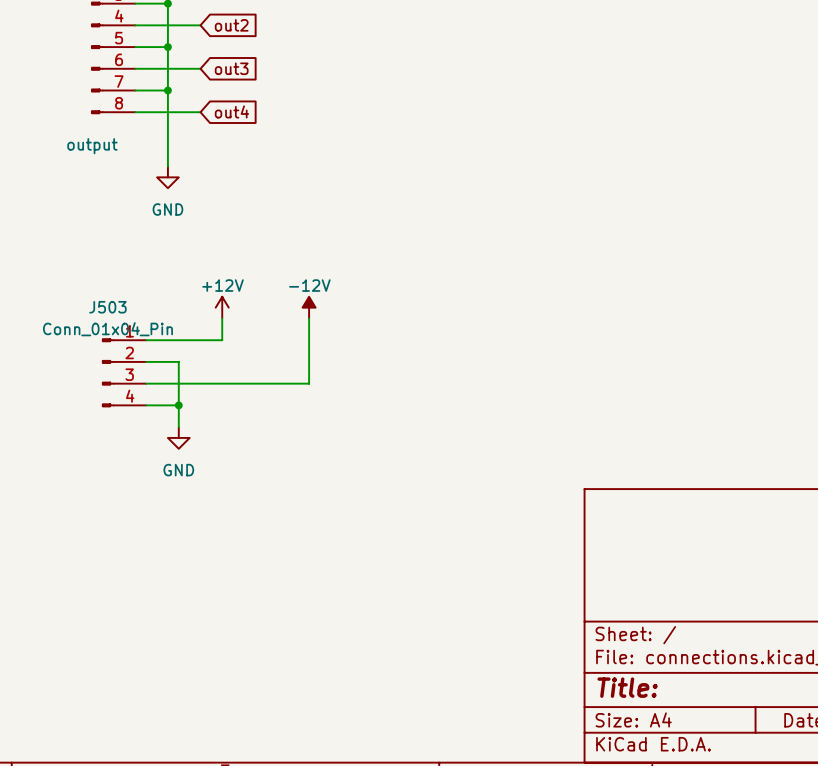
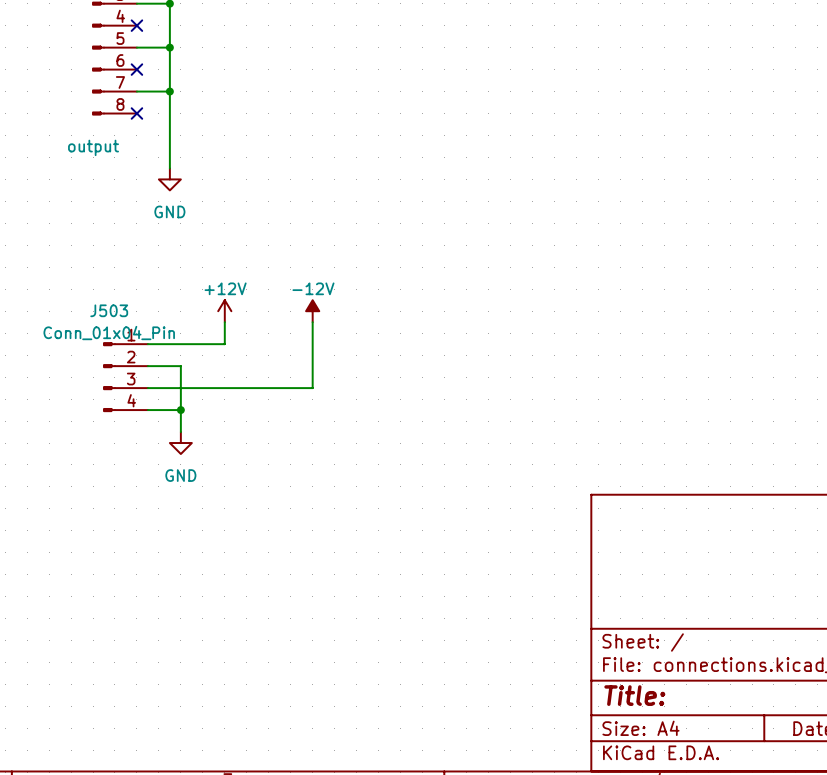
wire: (135, 25) (200, 25) -> none
no-connect mark: none -> (136, 25)
global label: out2 (231, 25) -> none
wire: (135, 68) (200, 68) -> none
no-connect mark: none -> (136, 69)
global label: out3 (231, 68) -> none
global label: out4 (231, 111) -> none
wire: (135, 112) (200, 112) -> none
no-connect mark: none -> (136, 113)

